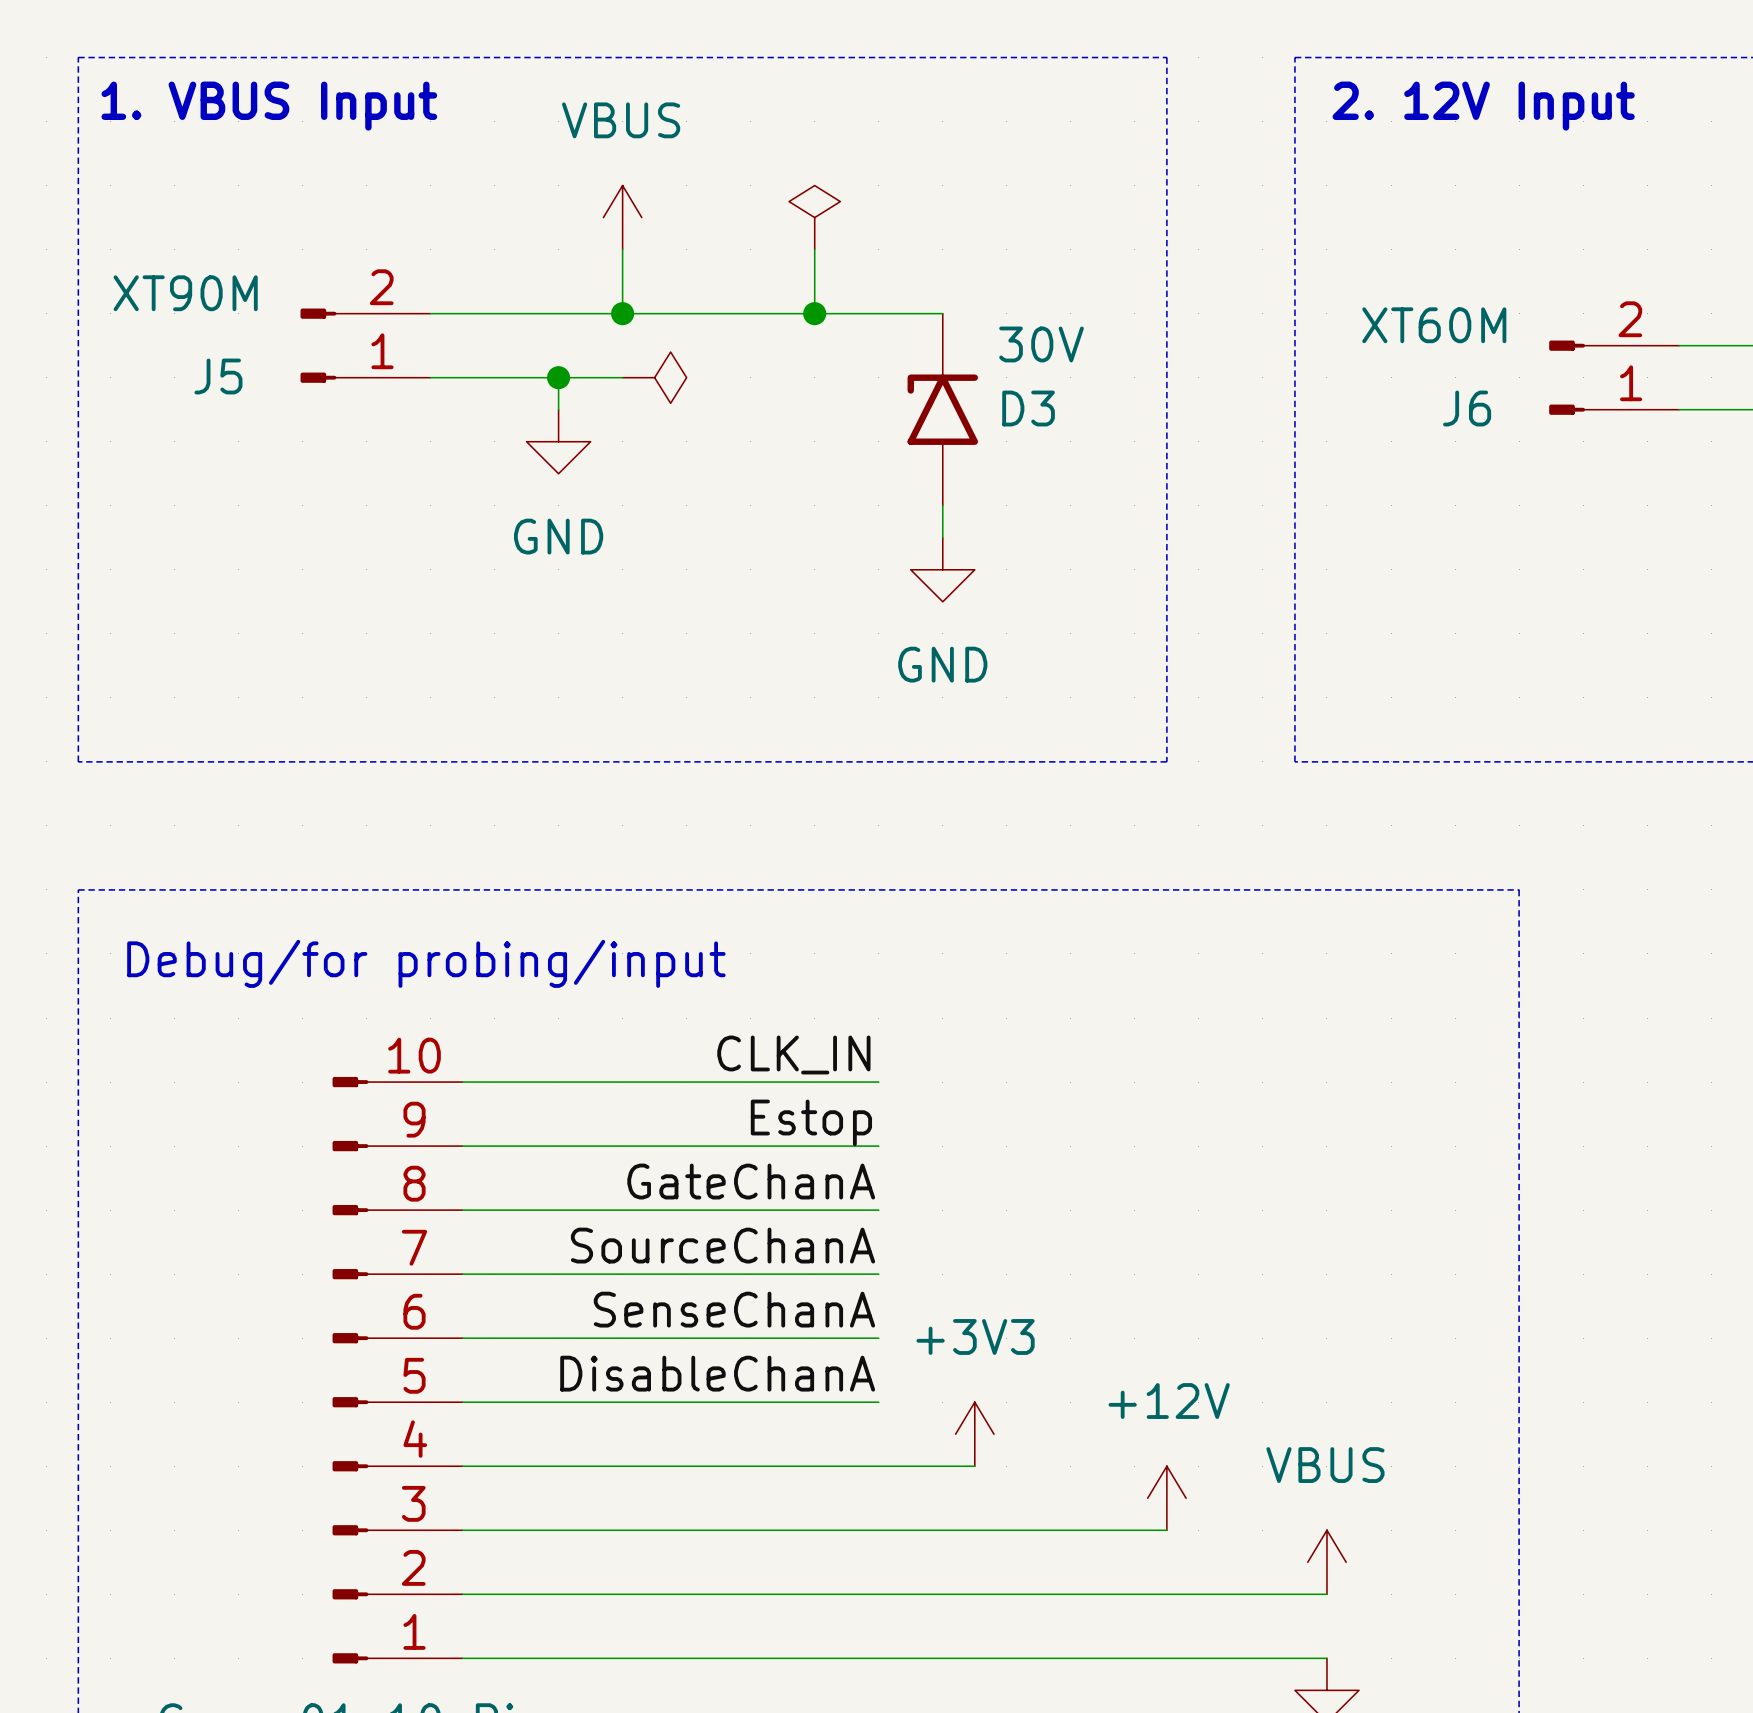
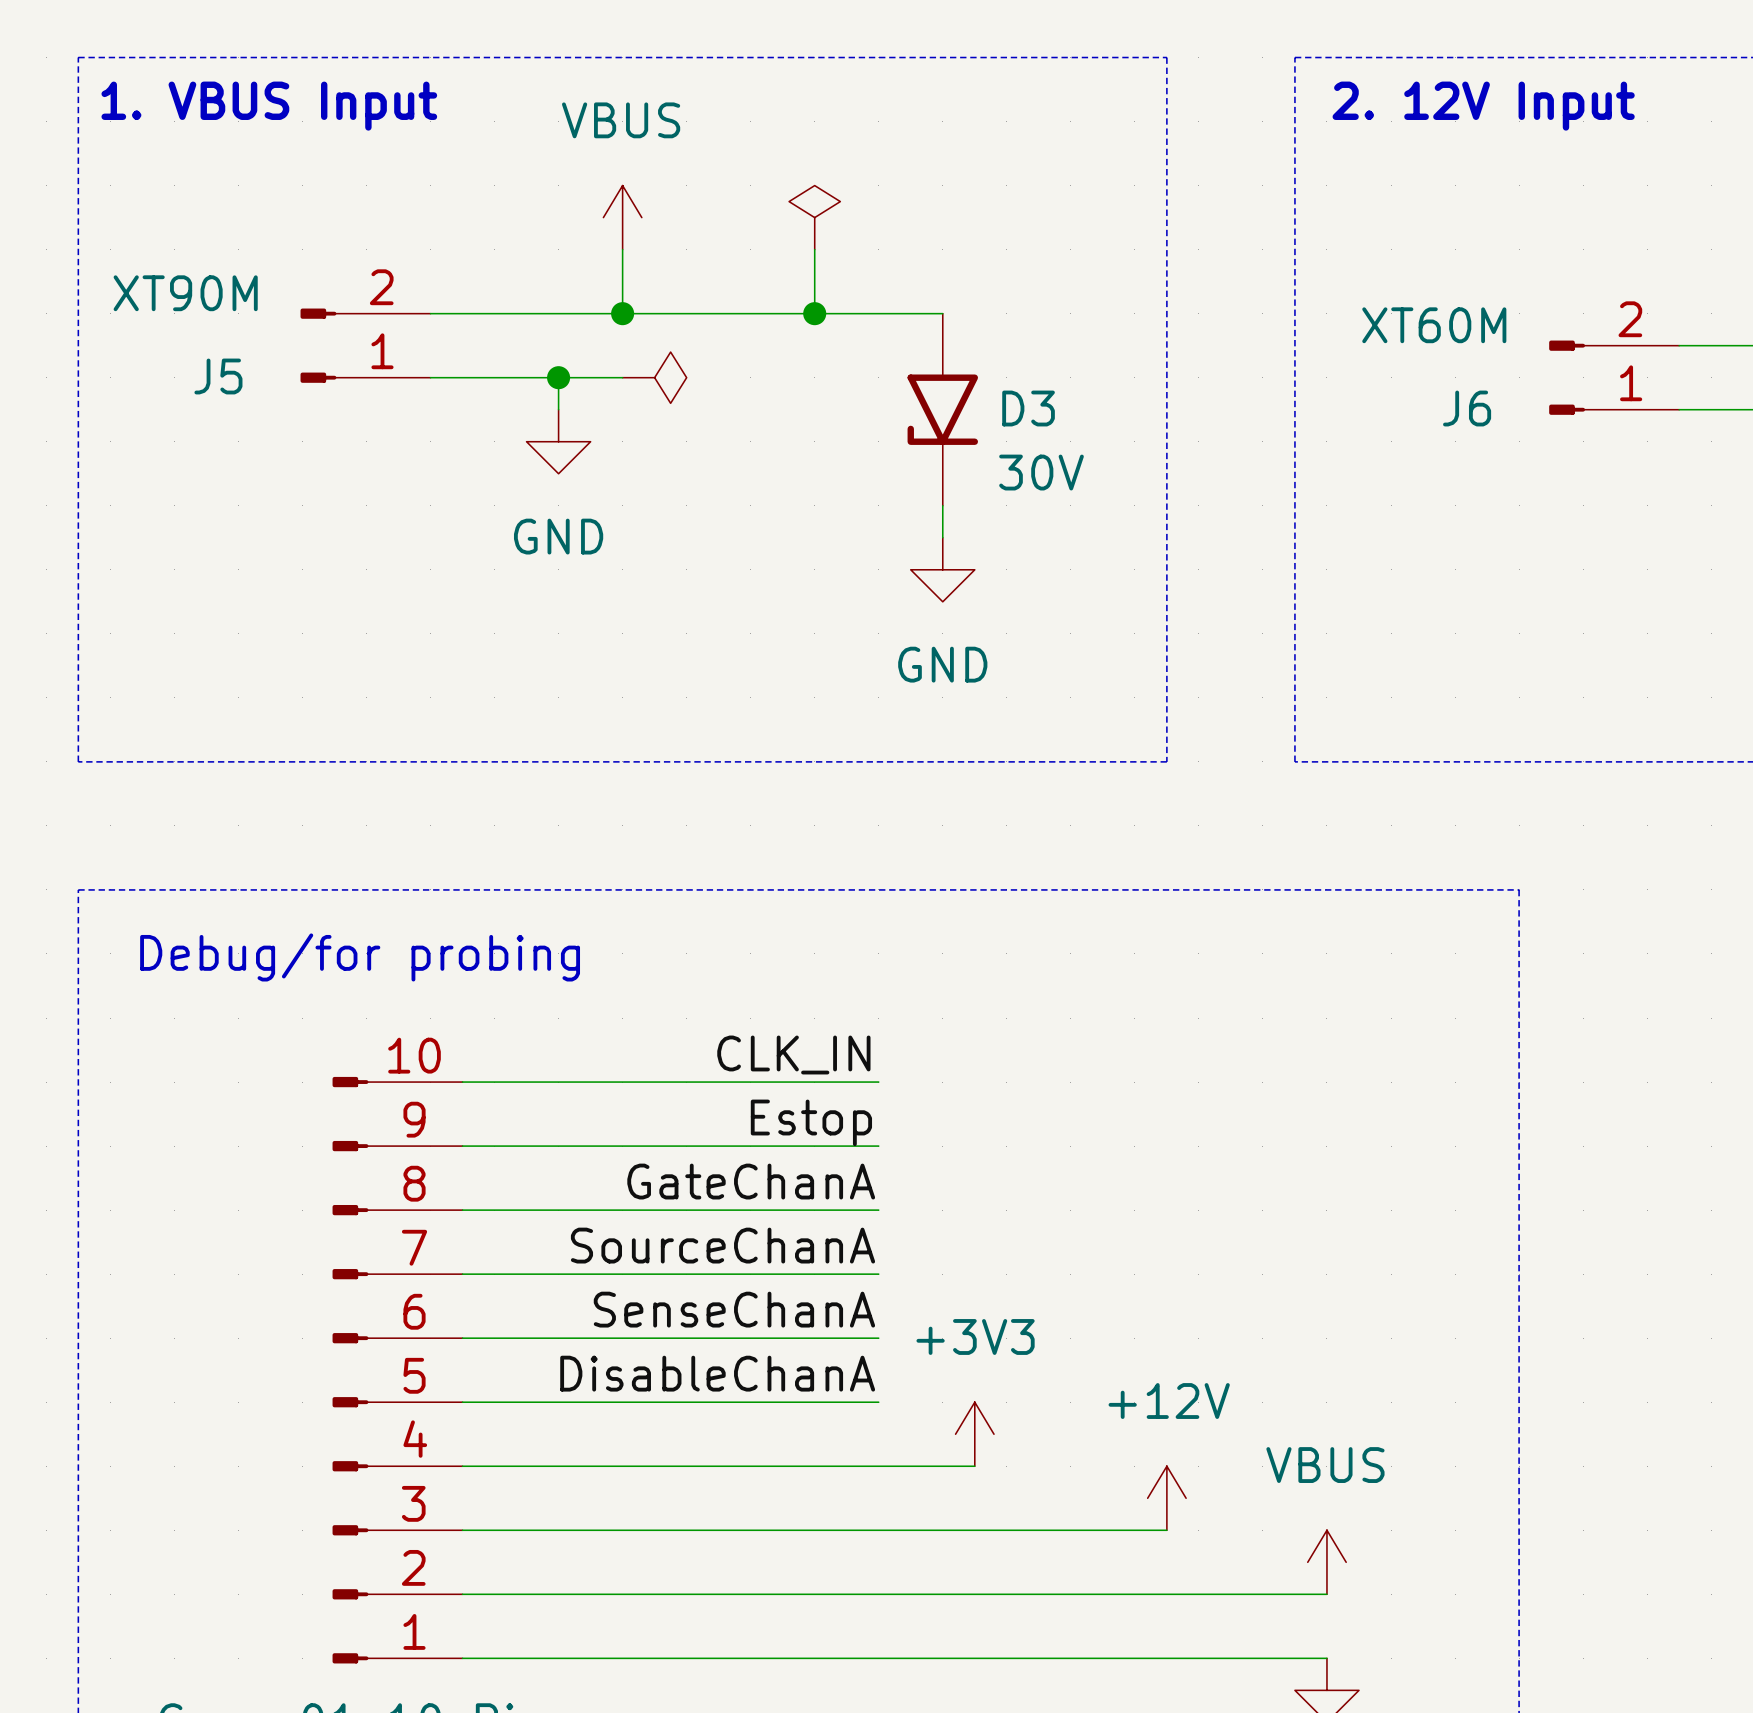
D3 flip: as is (942, 409) -> up-down (942, 409)
text: Debug/for probing/input (426, 963) -> Debug/for probing (360, 957)

